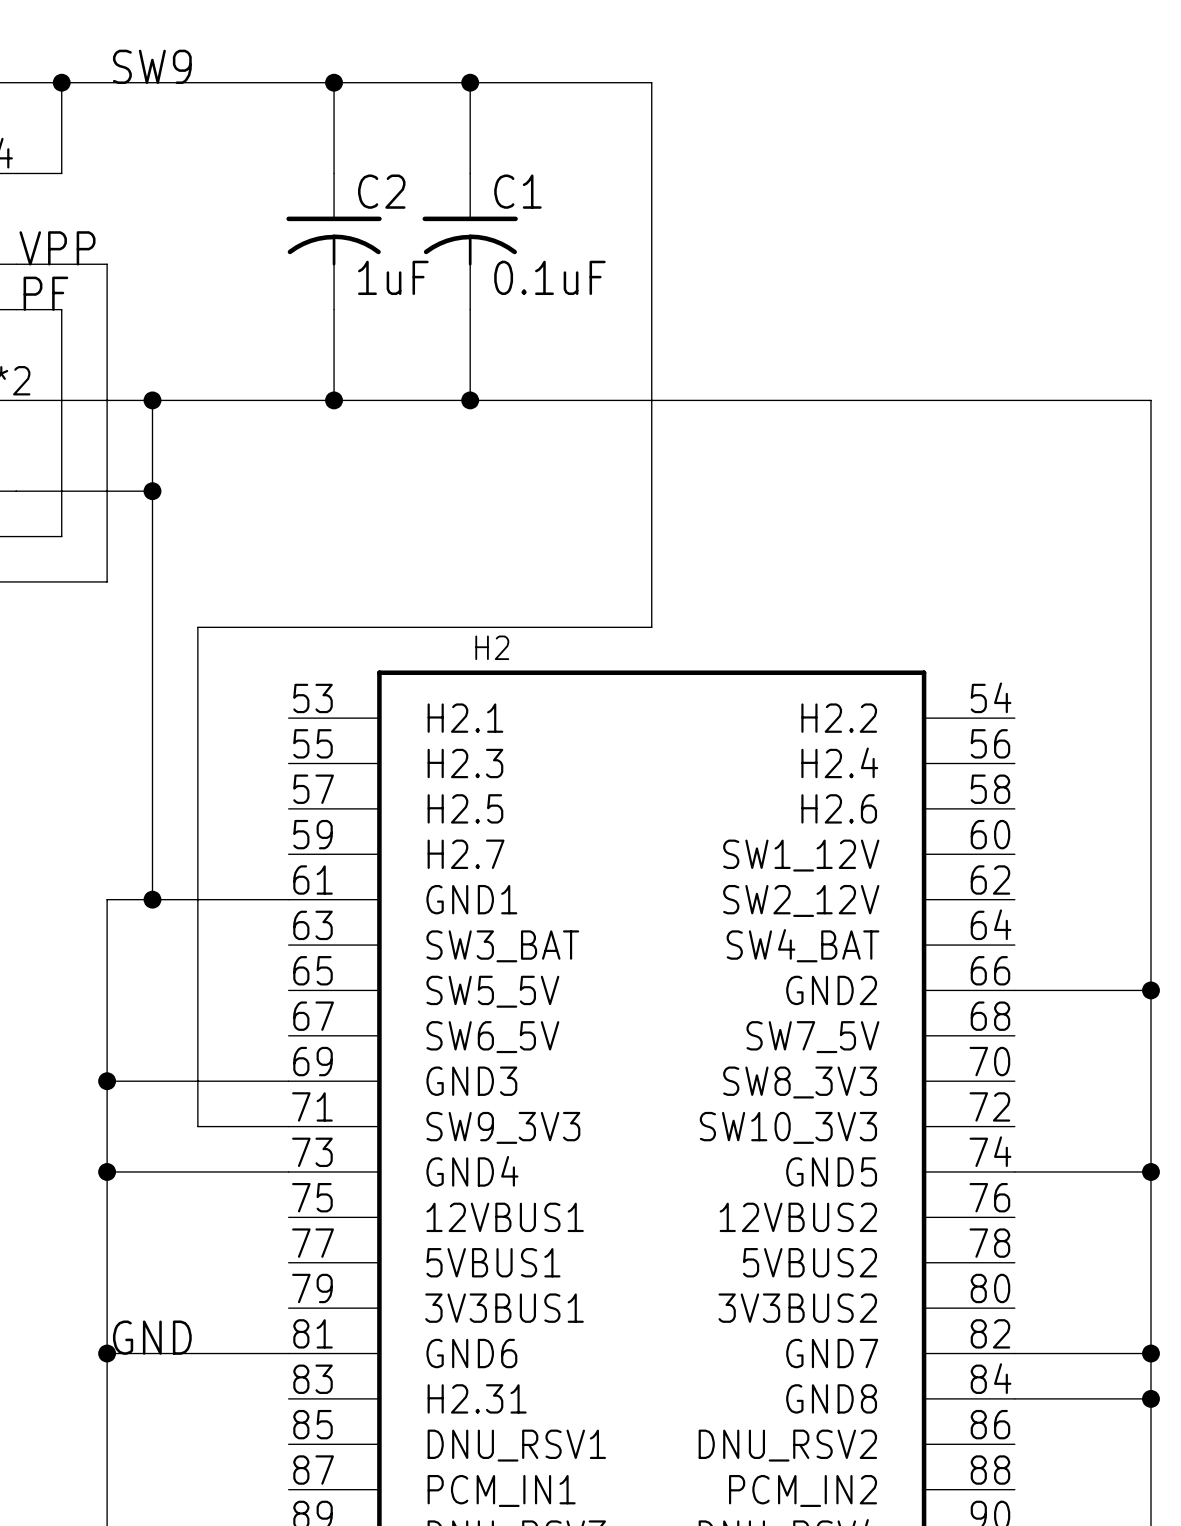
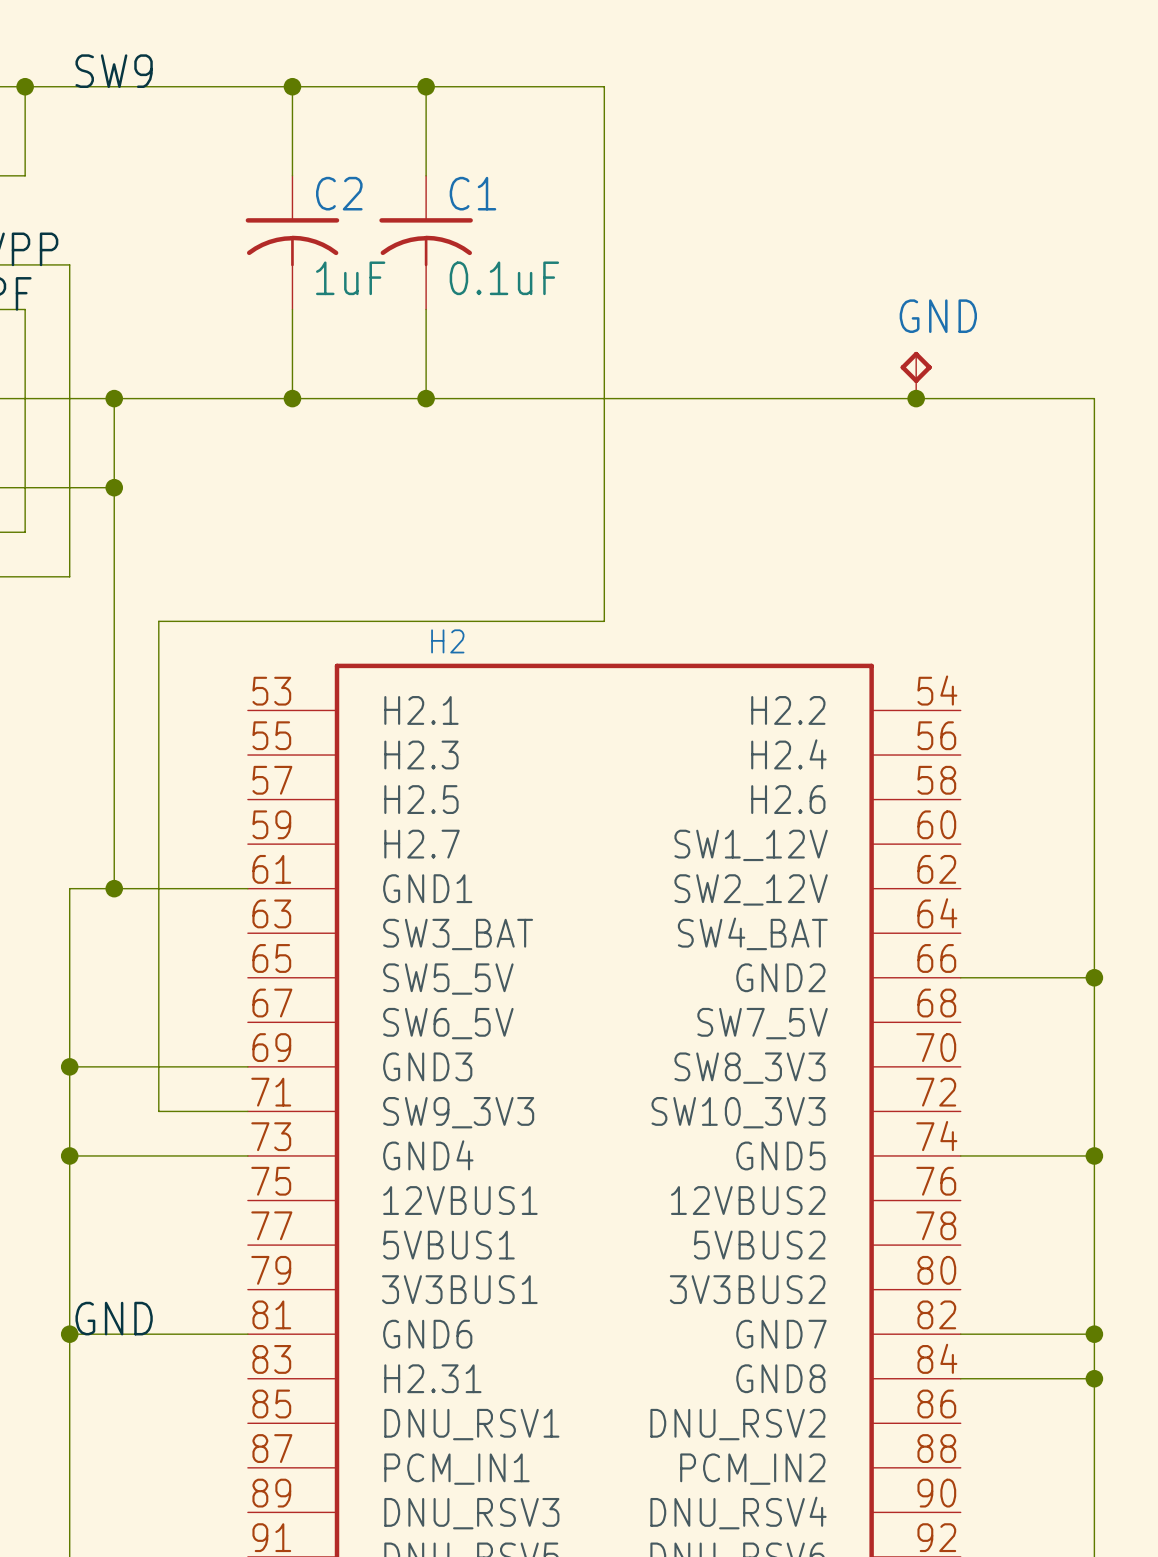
GND: none -> (916, 375)
junction: none -> (916, 398)

